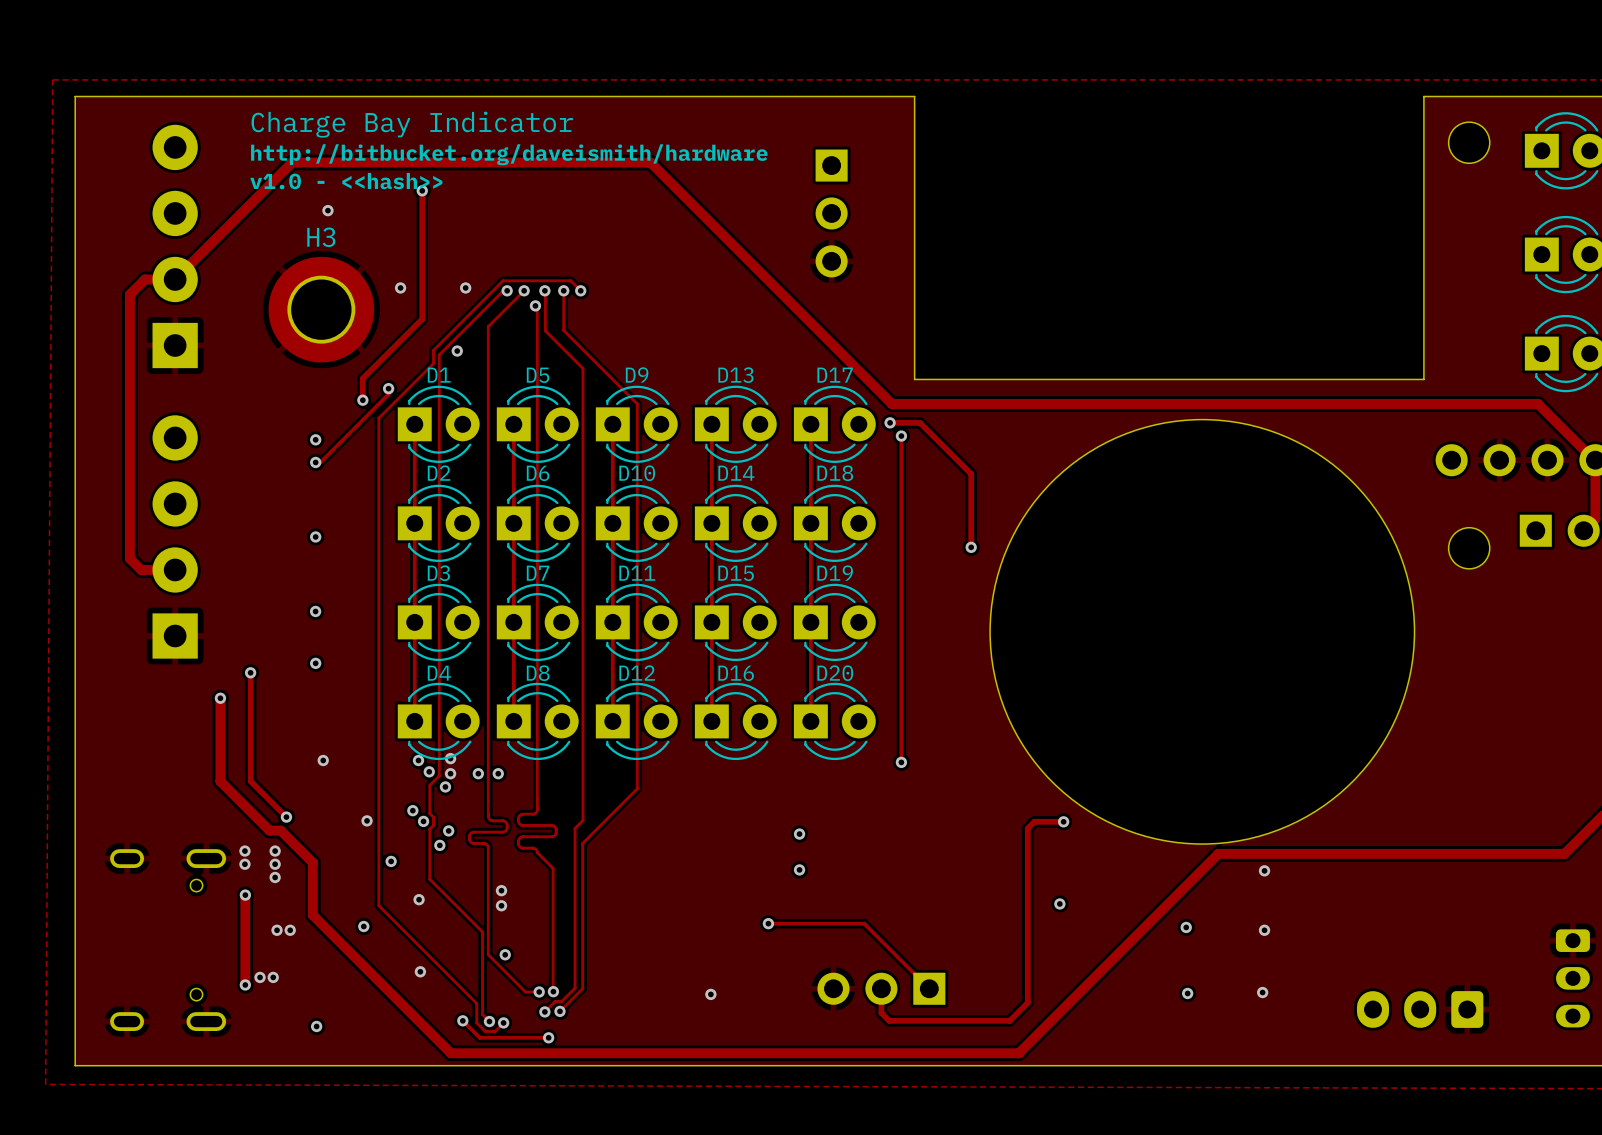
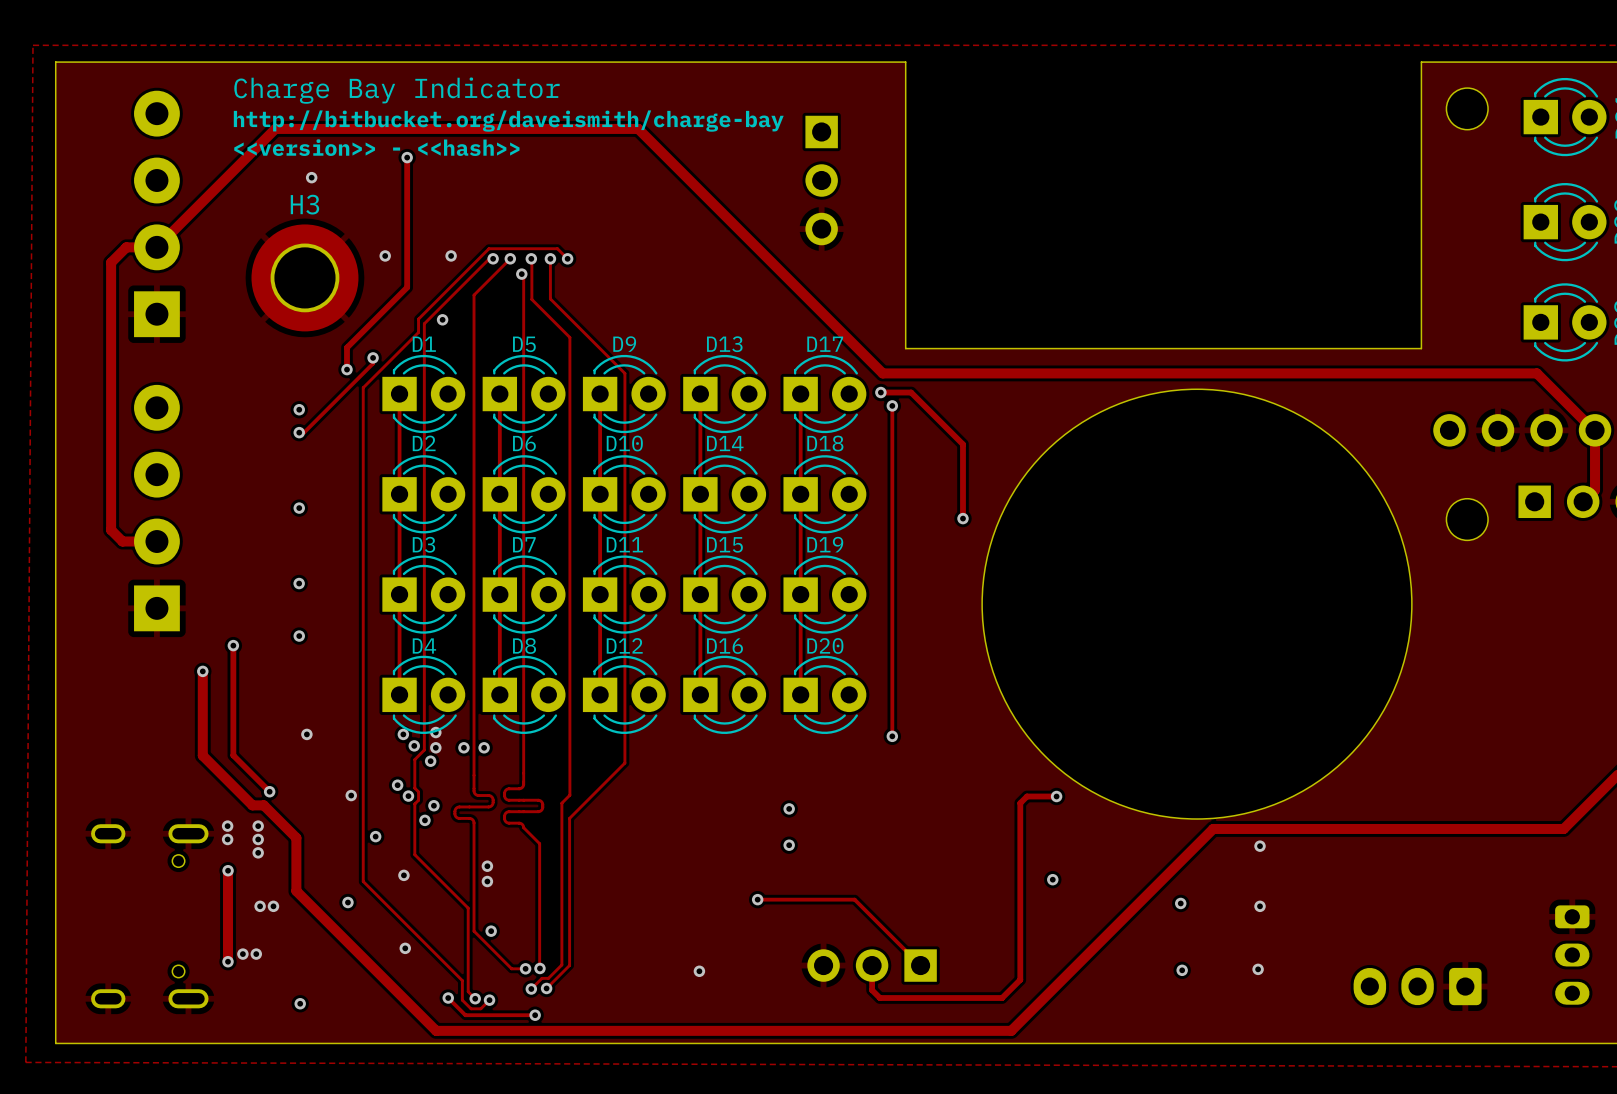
text: http://bitbucket.org/daveismith/hardware (509, 154) -> http://bitbucket.org/daveismith/charge-bay (508, 121)
text: v1.0 - <<hash>> (346, 181) -> <<version>> - <<hash>> (376, 147)

